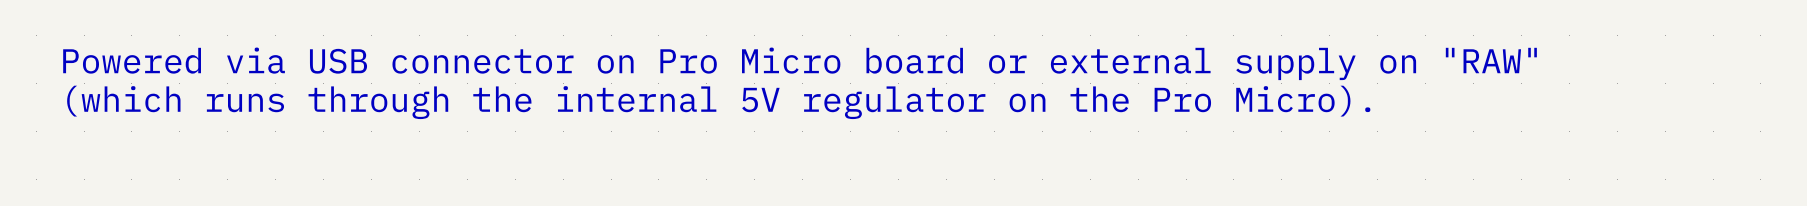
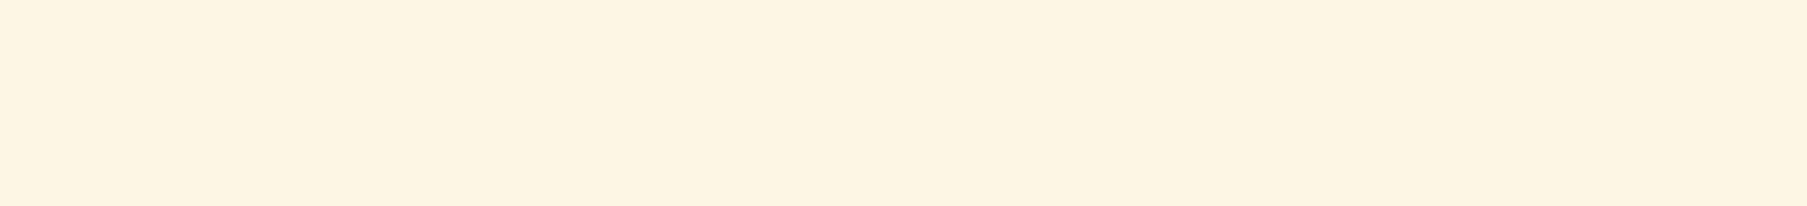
text: Powered via USB connector on Pro Micro board or external supply on "RAW" (800, 63) -> none
text: (which runs through the internal 5V regulator on the Pro Micro). (718, 102) -> none

